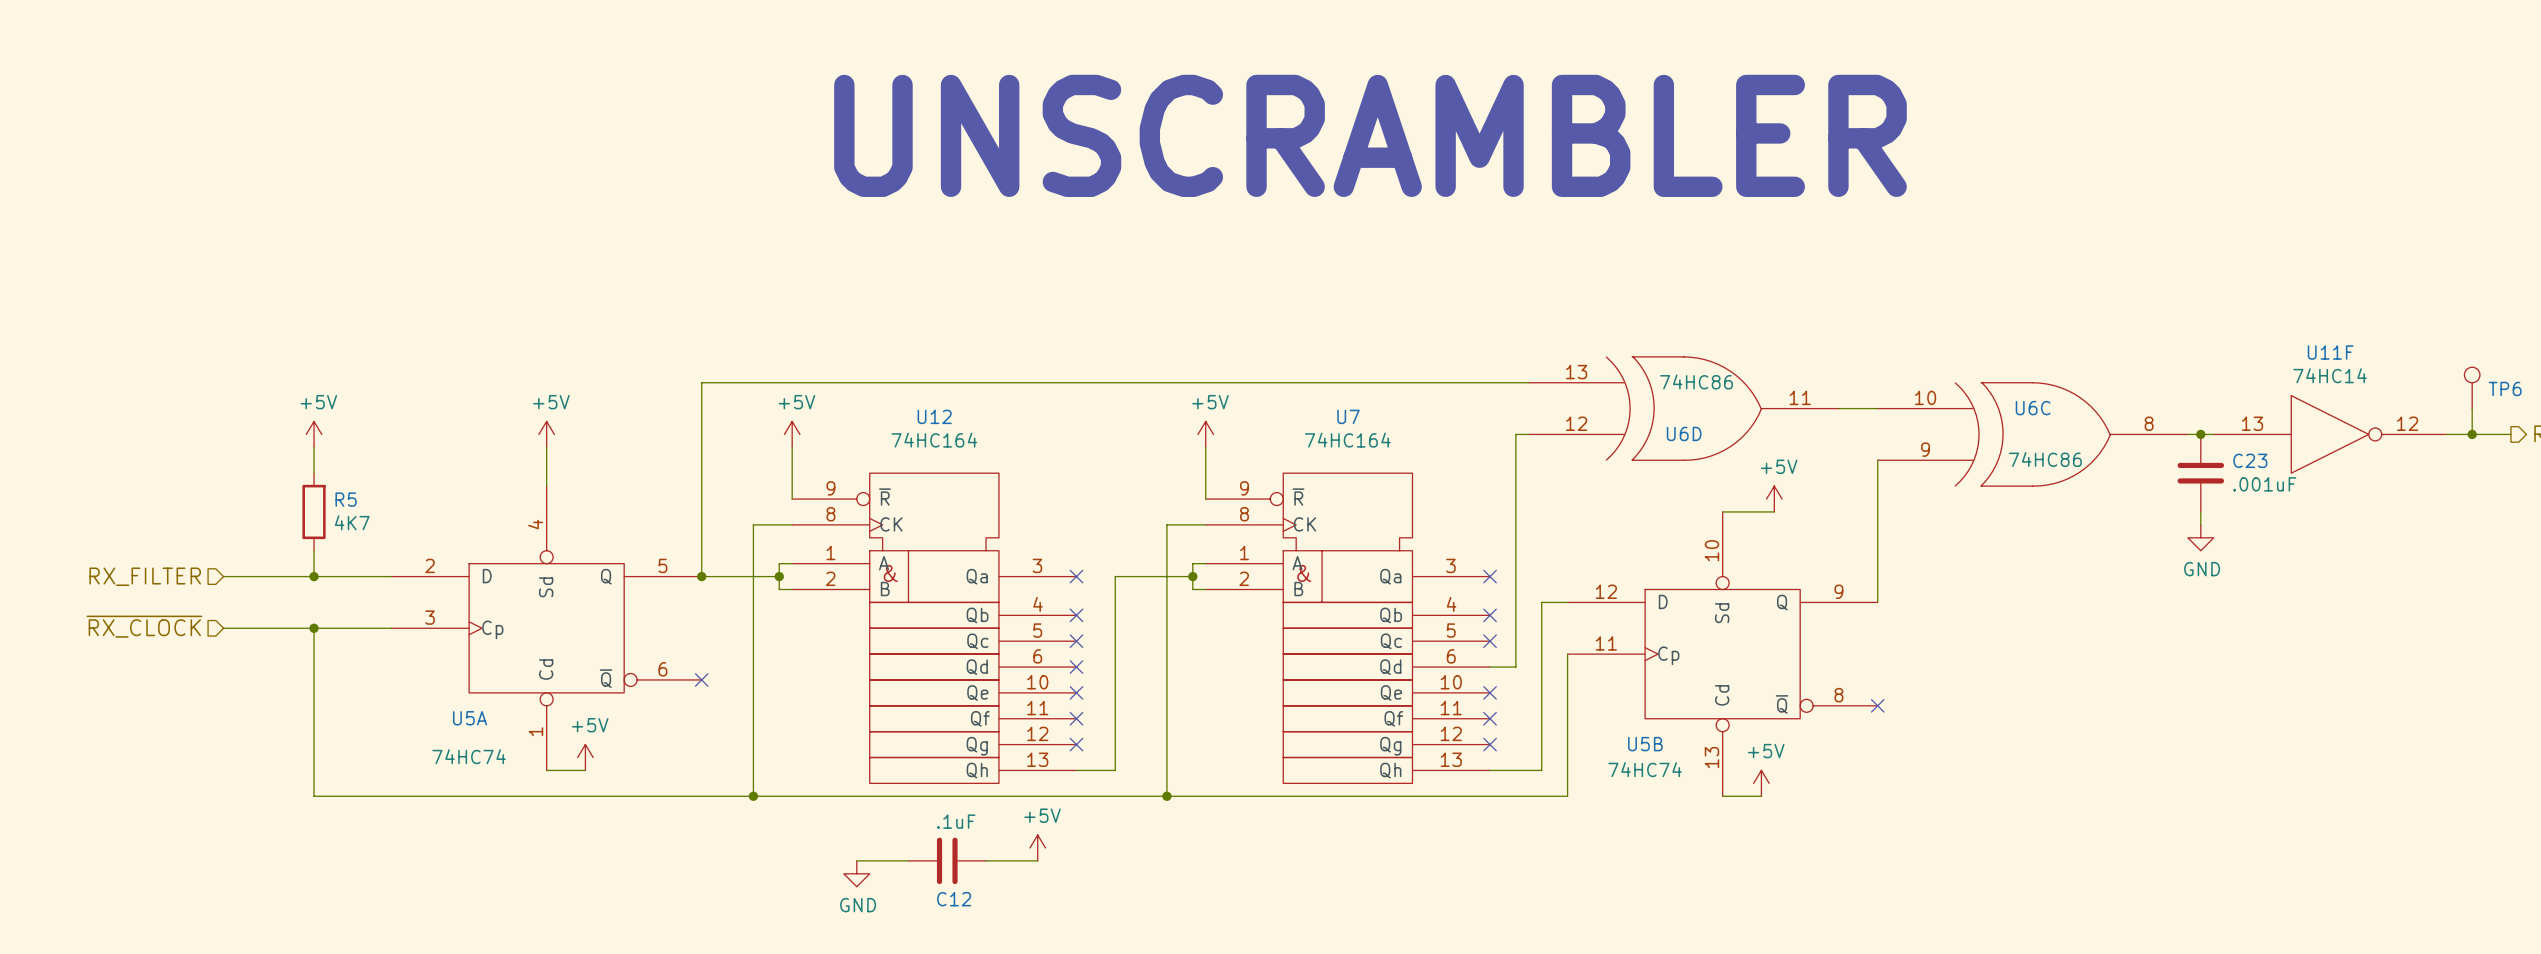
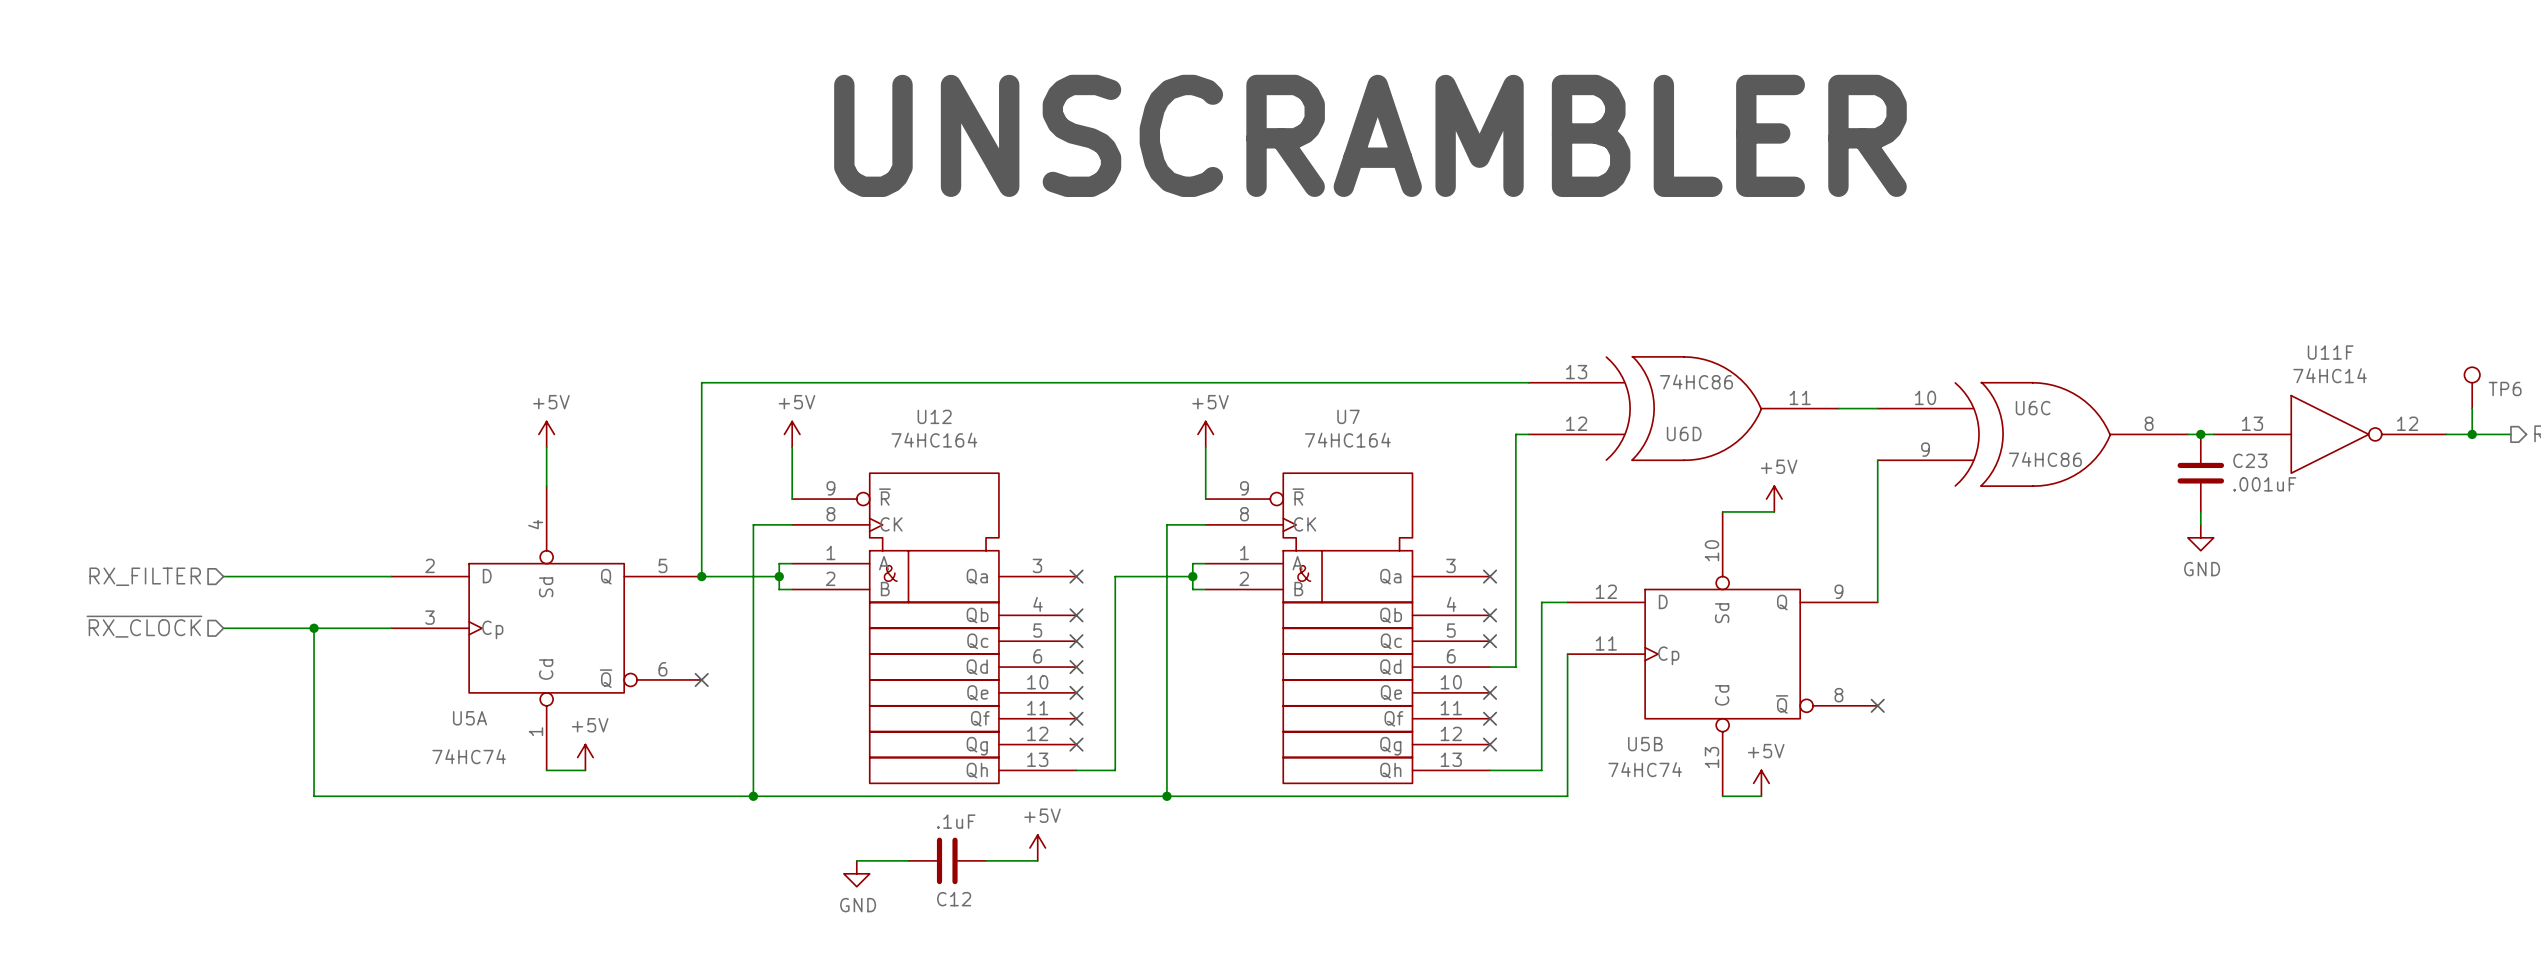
power symbol: +5V (314, 434) -> none
wire: (314, 447) (314, 473) -> none
R5: 4K7 (314, 511) -> none
wire: (314, 550) (314, 576) -> none
junction: (314, 576) -> none

